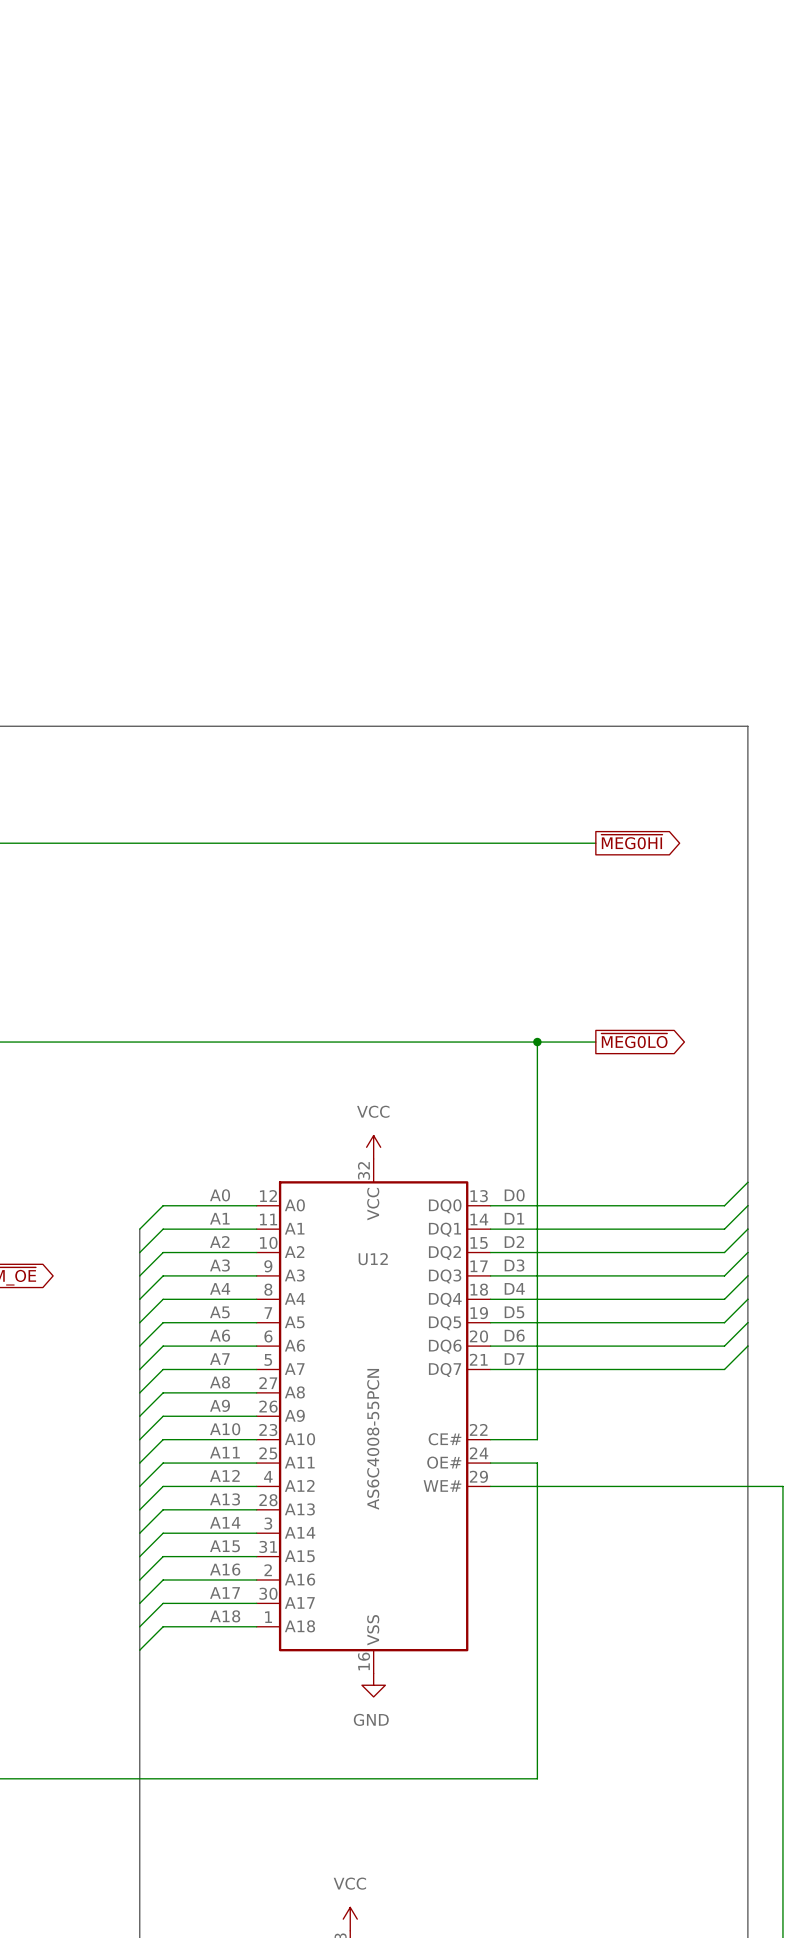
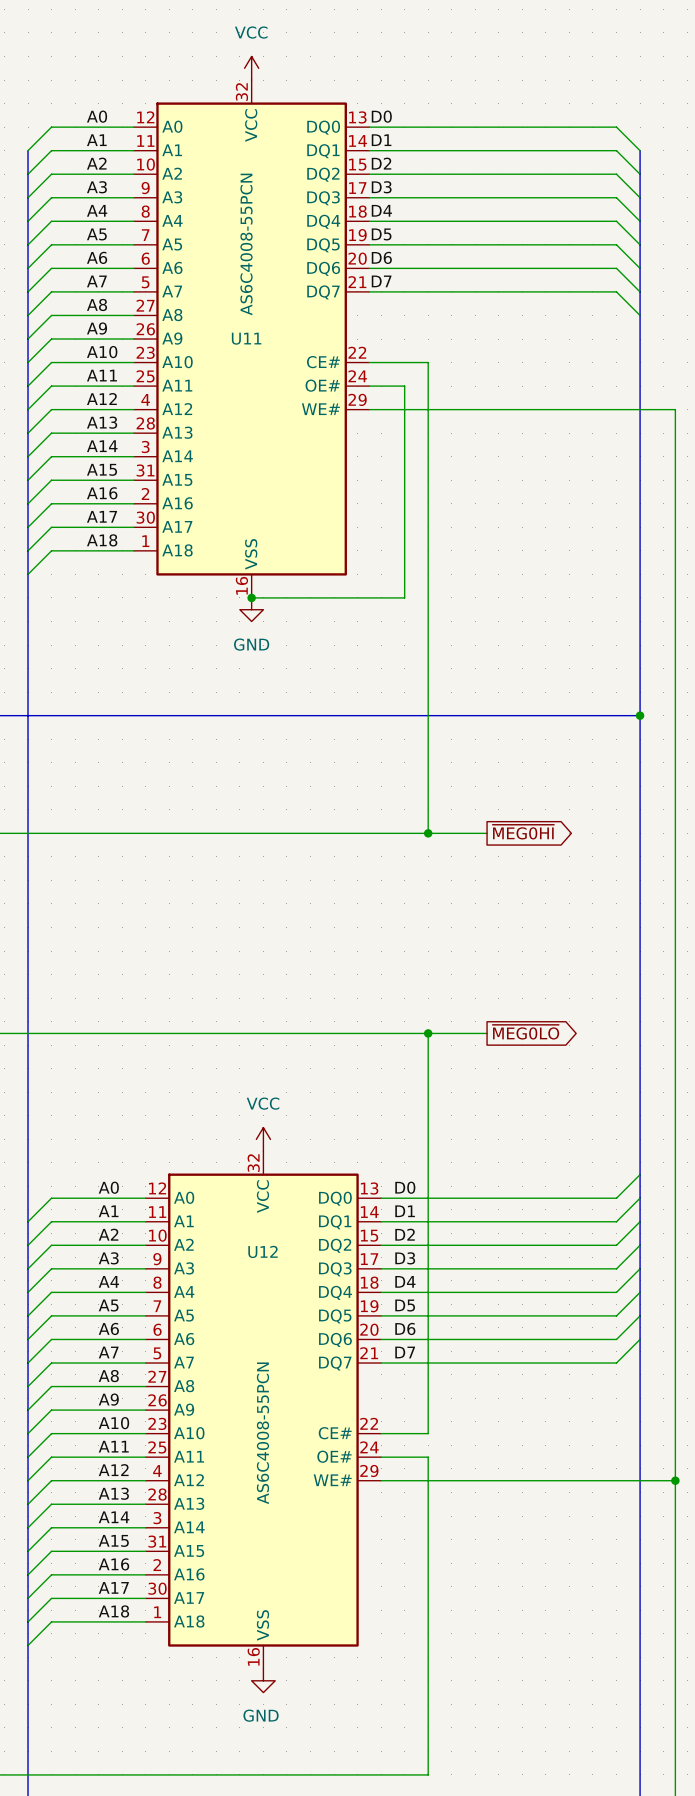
power symbol: none -> VCC (251, 68)
label: none -> A0 (97, 116)
label: none -> D0 (381, 116)
wire: none -> (133, 127) (51, 127) (28, 150)
wire: none -> (369, 127) (616, 127) (640, 150)
label: none -> A1 (96, 140)
label: none -> D1 (381, 140)
bus: none -> (28, 150) (28, 1221)
wire: none -> (133, 150) (51, 150) (28, 174)
wire: none -> (369, 150) (616, 150) (640, 174)
bus: none -> (640, 150) (640, 715)
label: none -> A2 (96, 163)
label: none -> D2 (381, 163)
wire: none -> (133, 174) (51, 174) (28, 197)
wire: none -> (369, 174) (616, 174) (640, 197)
label: none -> A3 (96, 187)
label: none -> D3 (381, 187)
wire: none -> (133, 197) (51, 197) (28, 221)
wire: none -> (369, 197) (616, 197) (640, 221)
label: none -> A4 (97, 210)
label: none -> D4 (381, 210)
wire: none -> (133, 221) (51, 221) (28, 244)
wire: none -> (369, 221) (616, 221) (640, 244)
label: none -> A5 (96, 234)
label: none -> D5 (381, 234)
wire: none -> (133, 244) (51, 244) (28, 268)
wire: none -> (369, 244) (616, 244) (640, 268)
label: none -> A6 (97, 257)
label: none -> D6 (381, 257)
wire: none -> (133, 268) (51, 268) (28, 291)
wire: none -> (369, 268) (616, 268) (640, 291)
label: none -> A7 (96, 281)
label: none -> D7 (381, 281)
wire: none -> (133, 291) (51, 291) (28, 315)
wire: none -> (369, 291) (616, 291) (640, 315)
label: none -> A8 (97, 304)
wire: none -> (133, 315) (51, 315) (28, 339)
label: none -> A9 (97, 328)
wire: none -> (133, 339) (51, 339) (28, 362)
U11: none -> AS6C4008-55PCN (251, 339)
label: none -> A10 (102, 352)
wire: none -> (133, 362) (51, 362) (28, 386)
wire: none -> (369, 362) (428, 362) (428, 833)
label: none -> A11 (101, 375)
wire: none -> (133, 386) (51, 386) (28, 409)
wire: none -> (369, 386) (404, 386) (404, 597) (251, 597)
label: none -> A12 (101, 399)
wire: none -> (133, 409) (51, 409) (28, 433)
wire: none -> (369, 409) (675, 409) (675, 1480)
label: none -> A13 (102, 422)
wire: none -> (133, 433) (51, 433) (28, 456)
label: none -> A14 (102, 446)
wire: none -> (133, 456) (51, 456) (28, 480)
label: none -> A15 (102, 469)
wire: none -> (133, 480) (51, 480) (28, 503)
label: none -> A16 (102, 493)
wire: none -> (133, 503) (51, 503) (28, 527)
label: none -> A17 (102, 516)
wire: none -> (133, 527) (51, 527) (28, 550)
label: none -> A18 (102, 540)
wire: none -> (133, 550) (51, 550) (28, 574)
junction: none -> (251, 597)
power symbol: none -> GND (251, 609)
junction: none -> (640, 715)
junction: none -> (428, 833)
junction: none -> (675, 1480)

